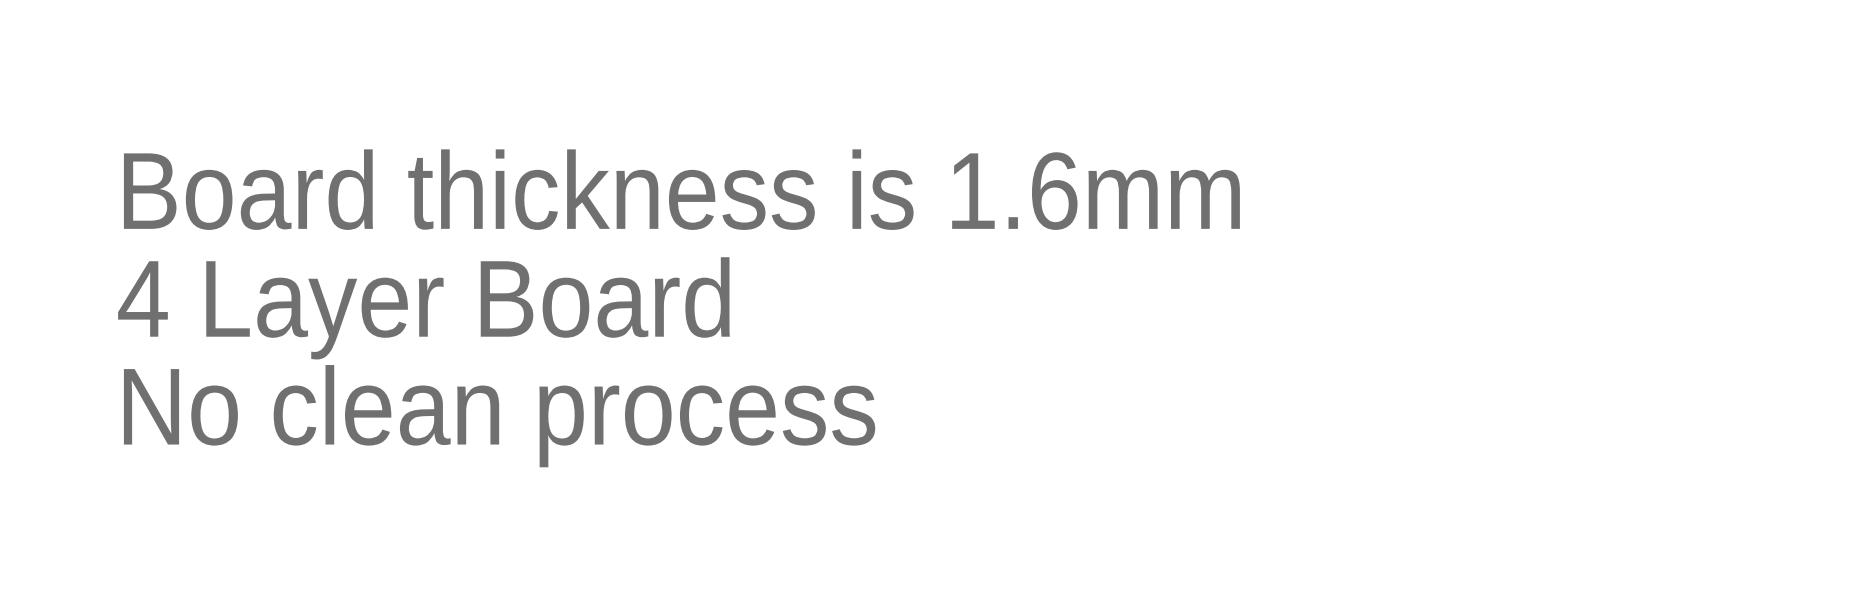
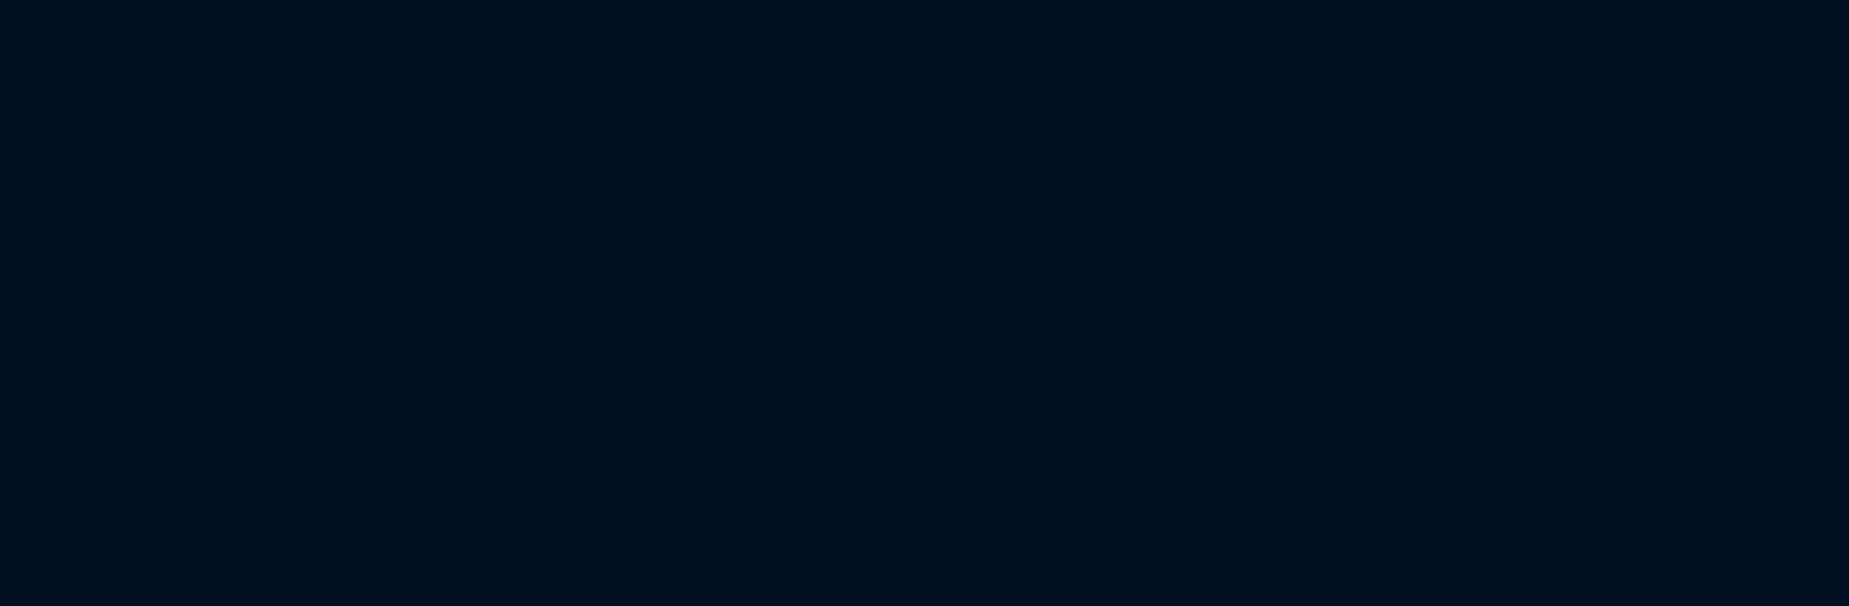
text: Board thickness is 1.6mm (681, 189) -> none
text: 4 Layer Board (423, 308) -> none
text: No clean process (499, 416) -> none

